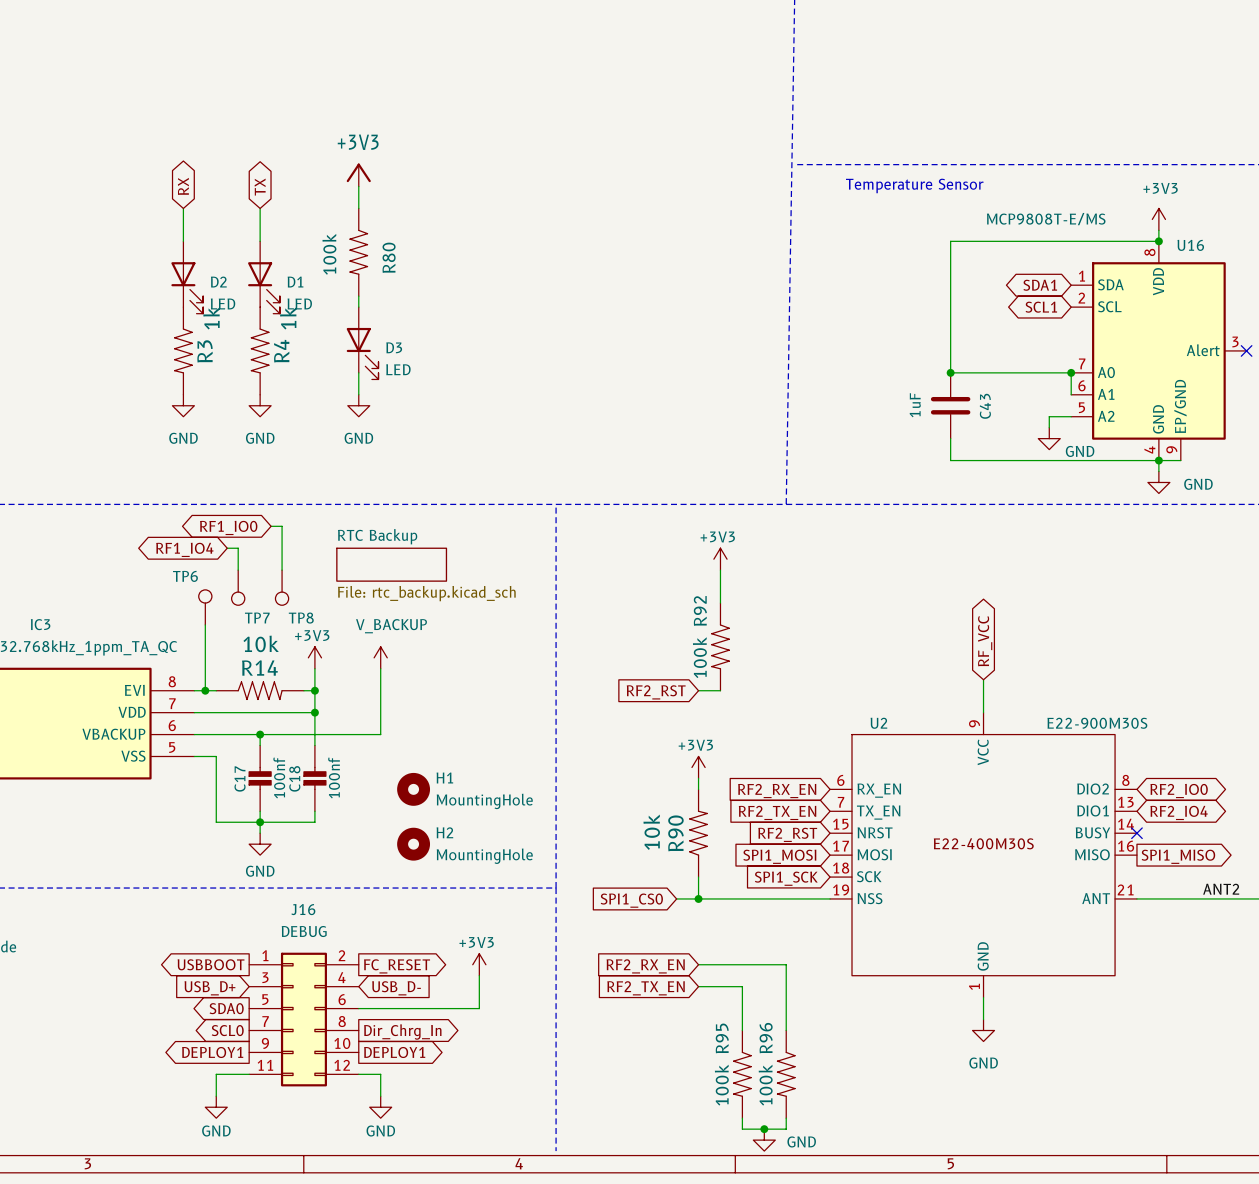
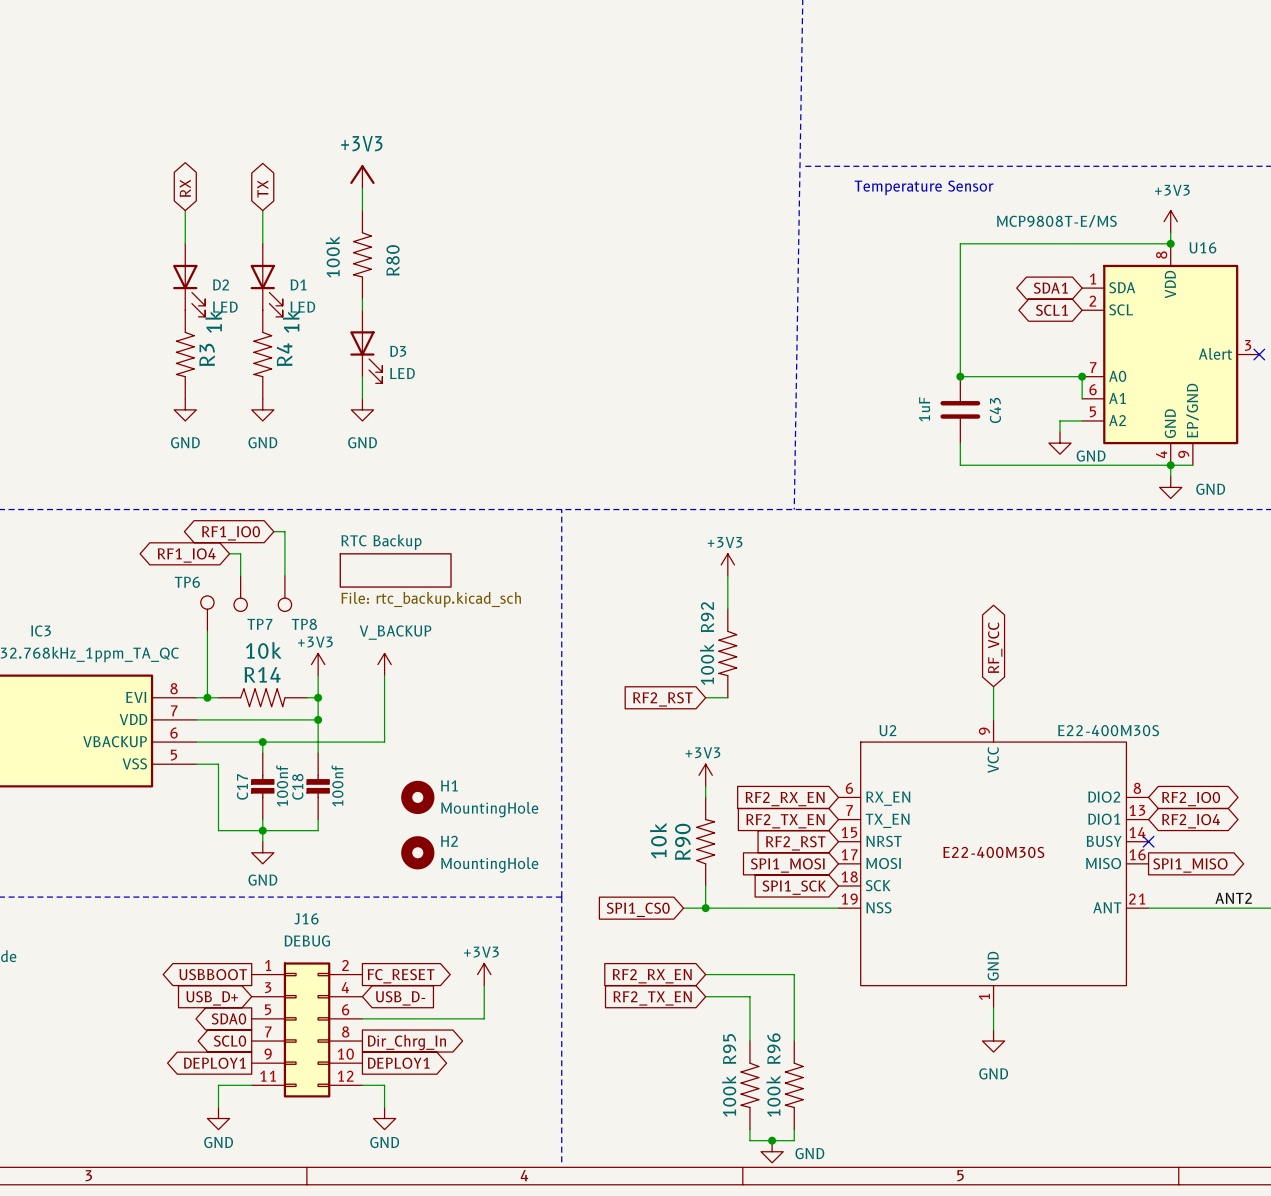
U2 value: E22-900M30S (1097, 723) -> E22-400M30S (1108, 730)

